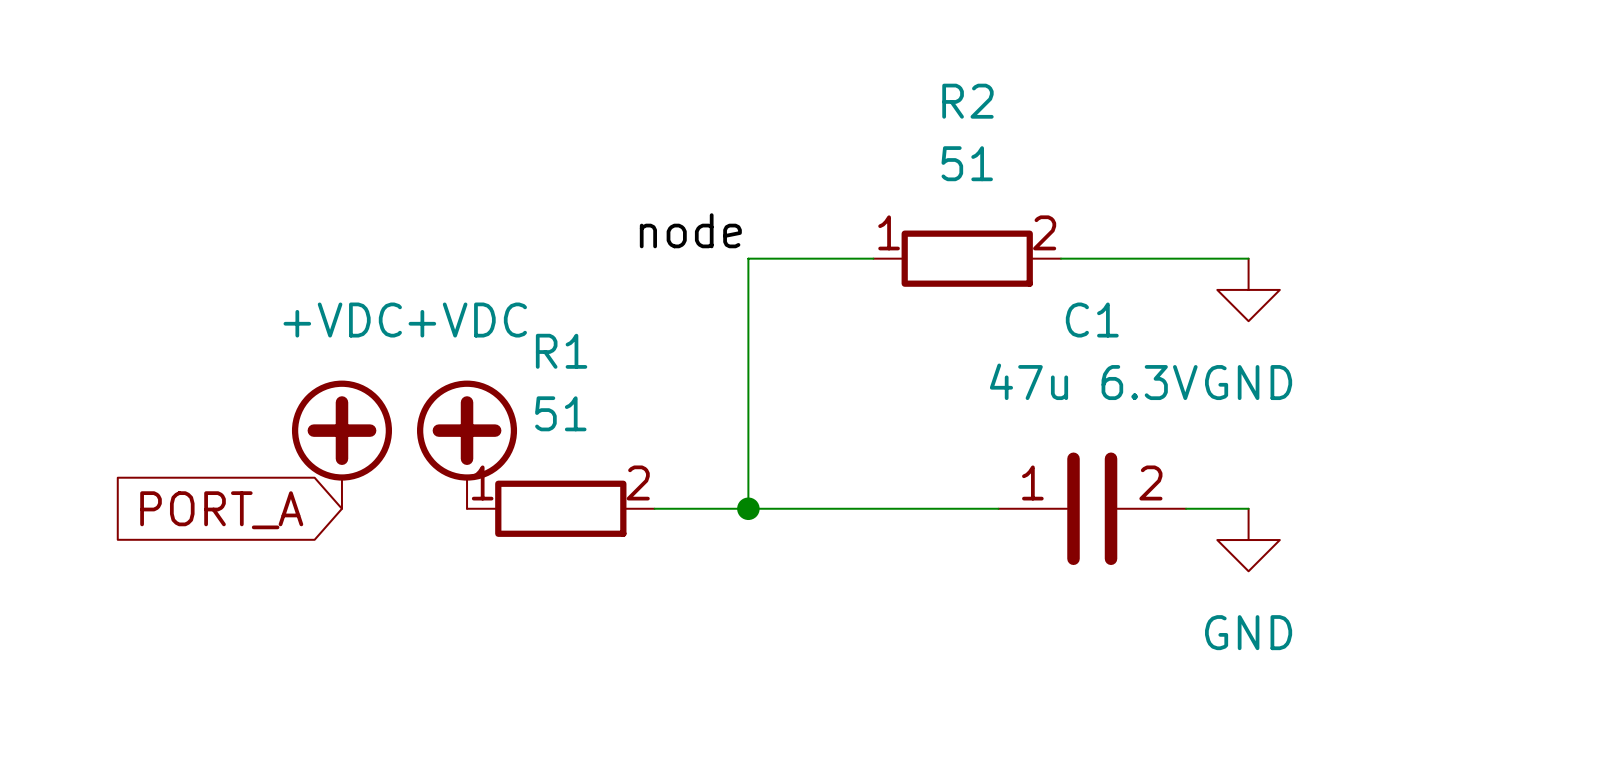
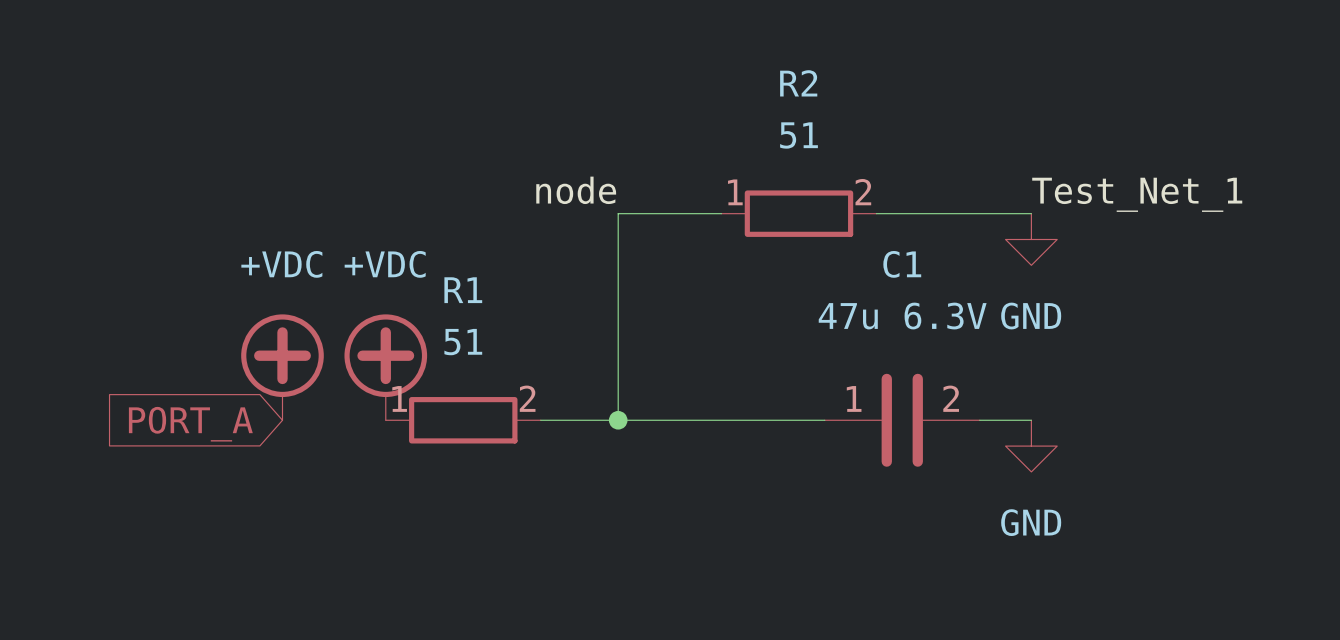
label: none -> Test_Net_1 (1137, 194)

